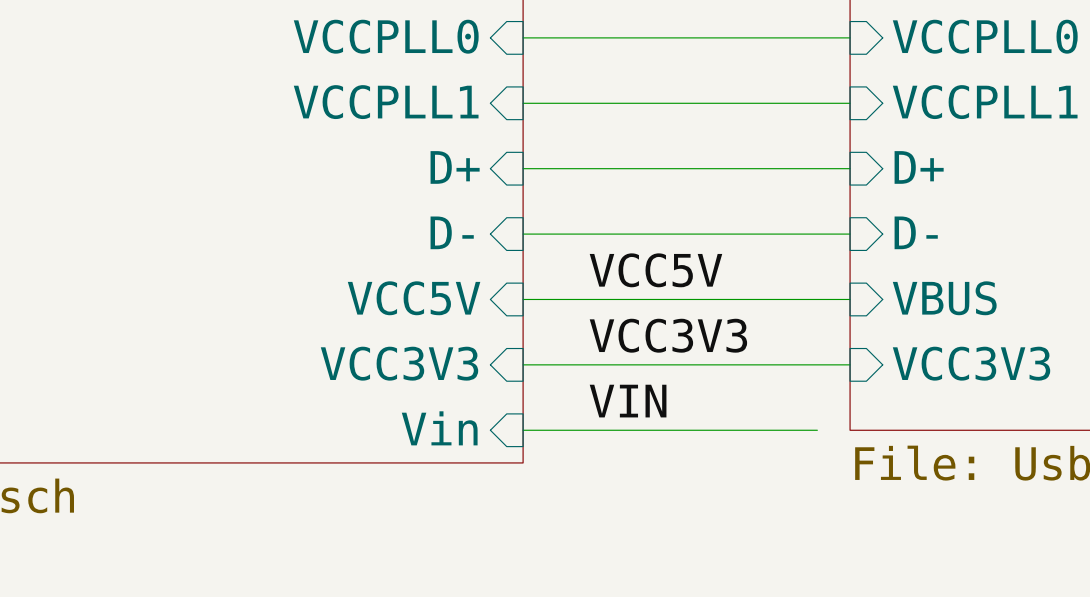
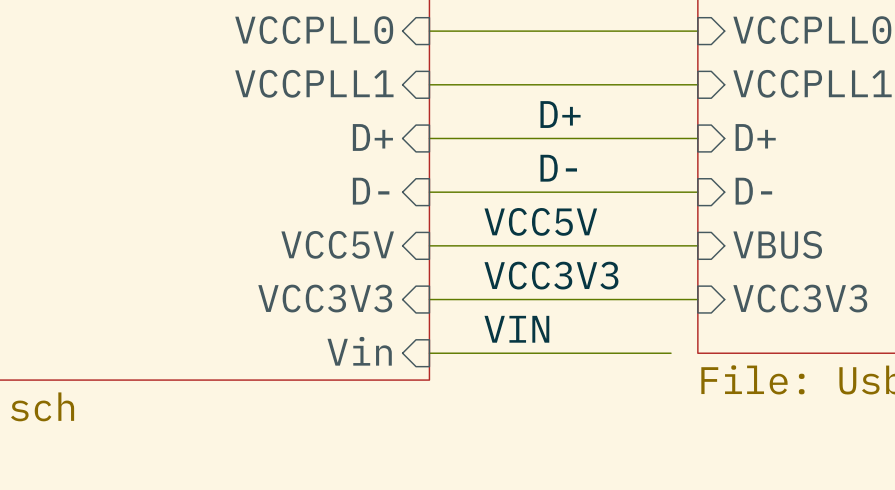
label: none -> D+ (560, 114)
label: none -> D- (558, 168)

